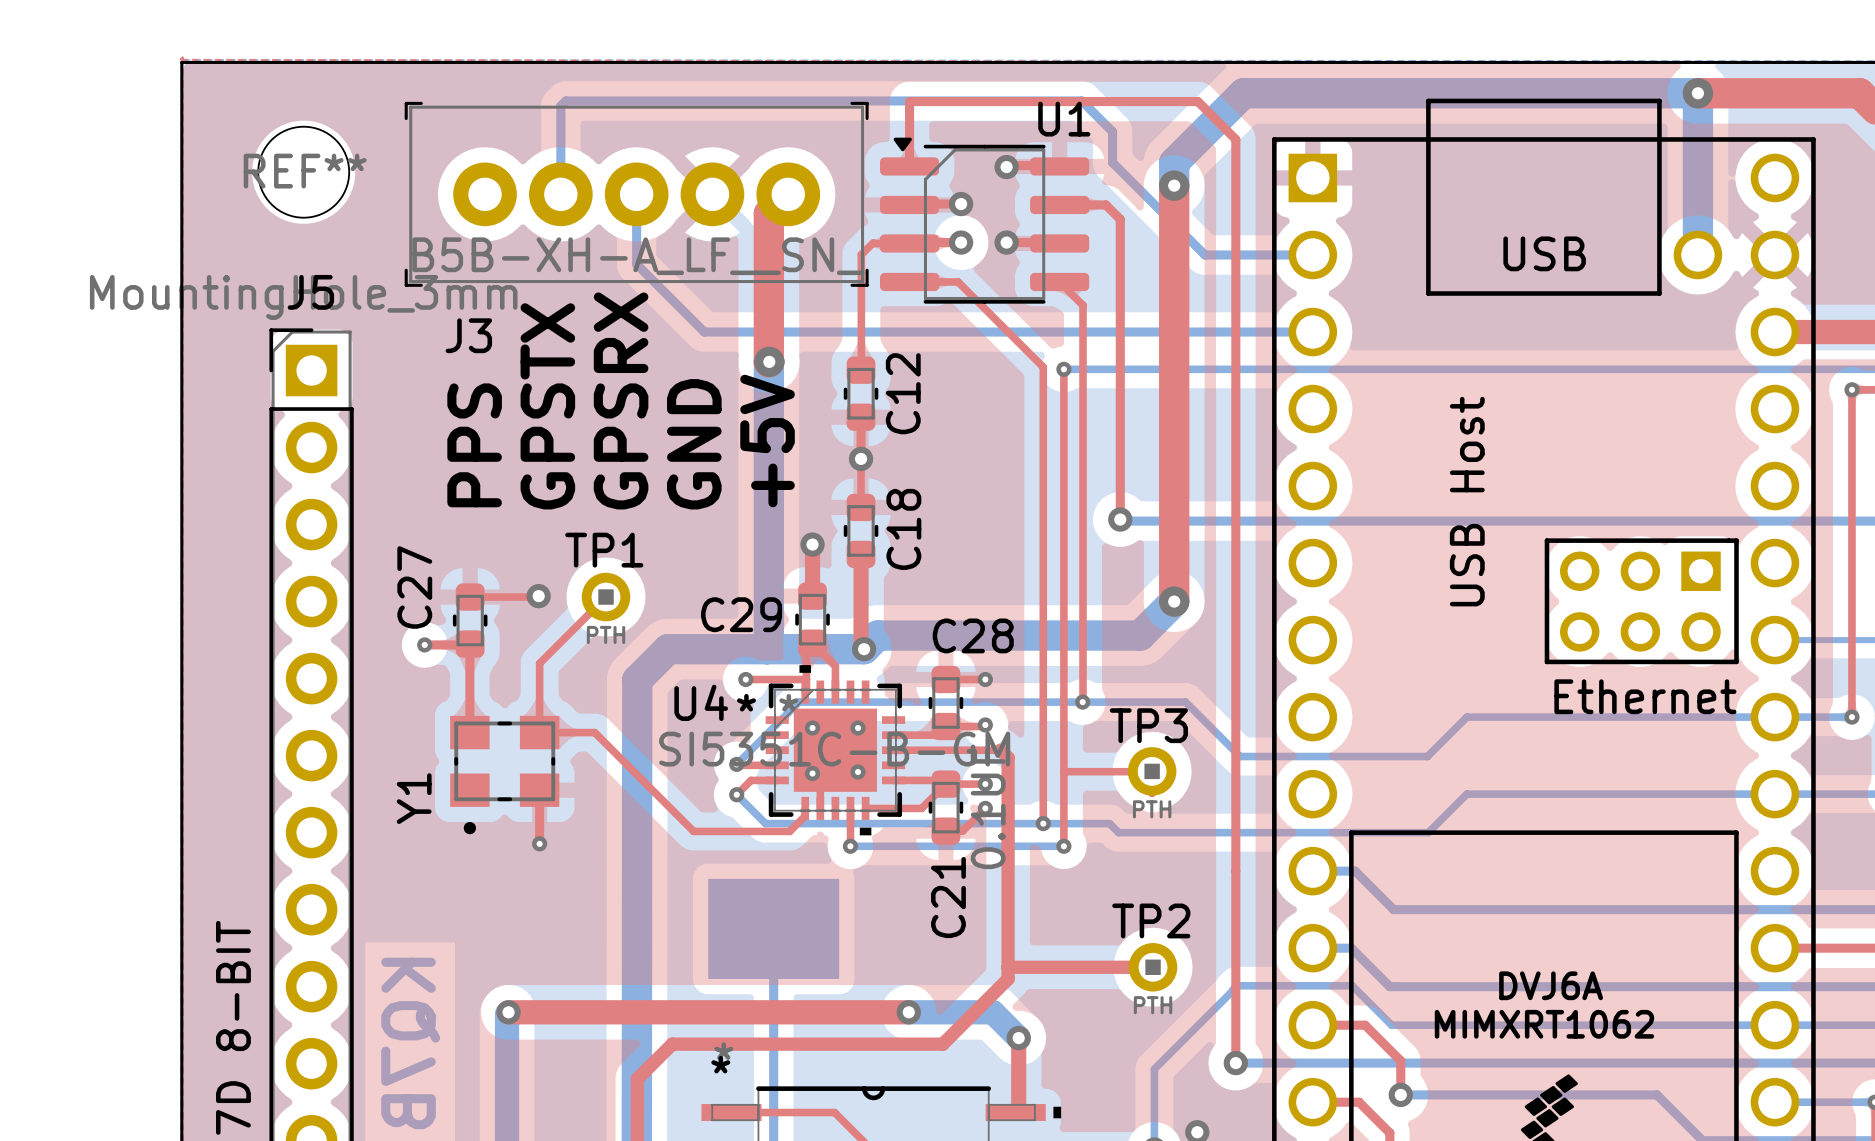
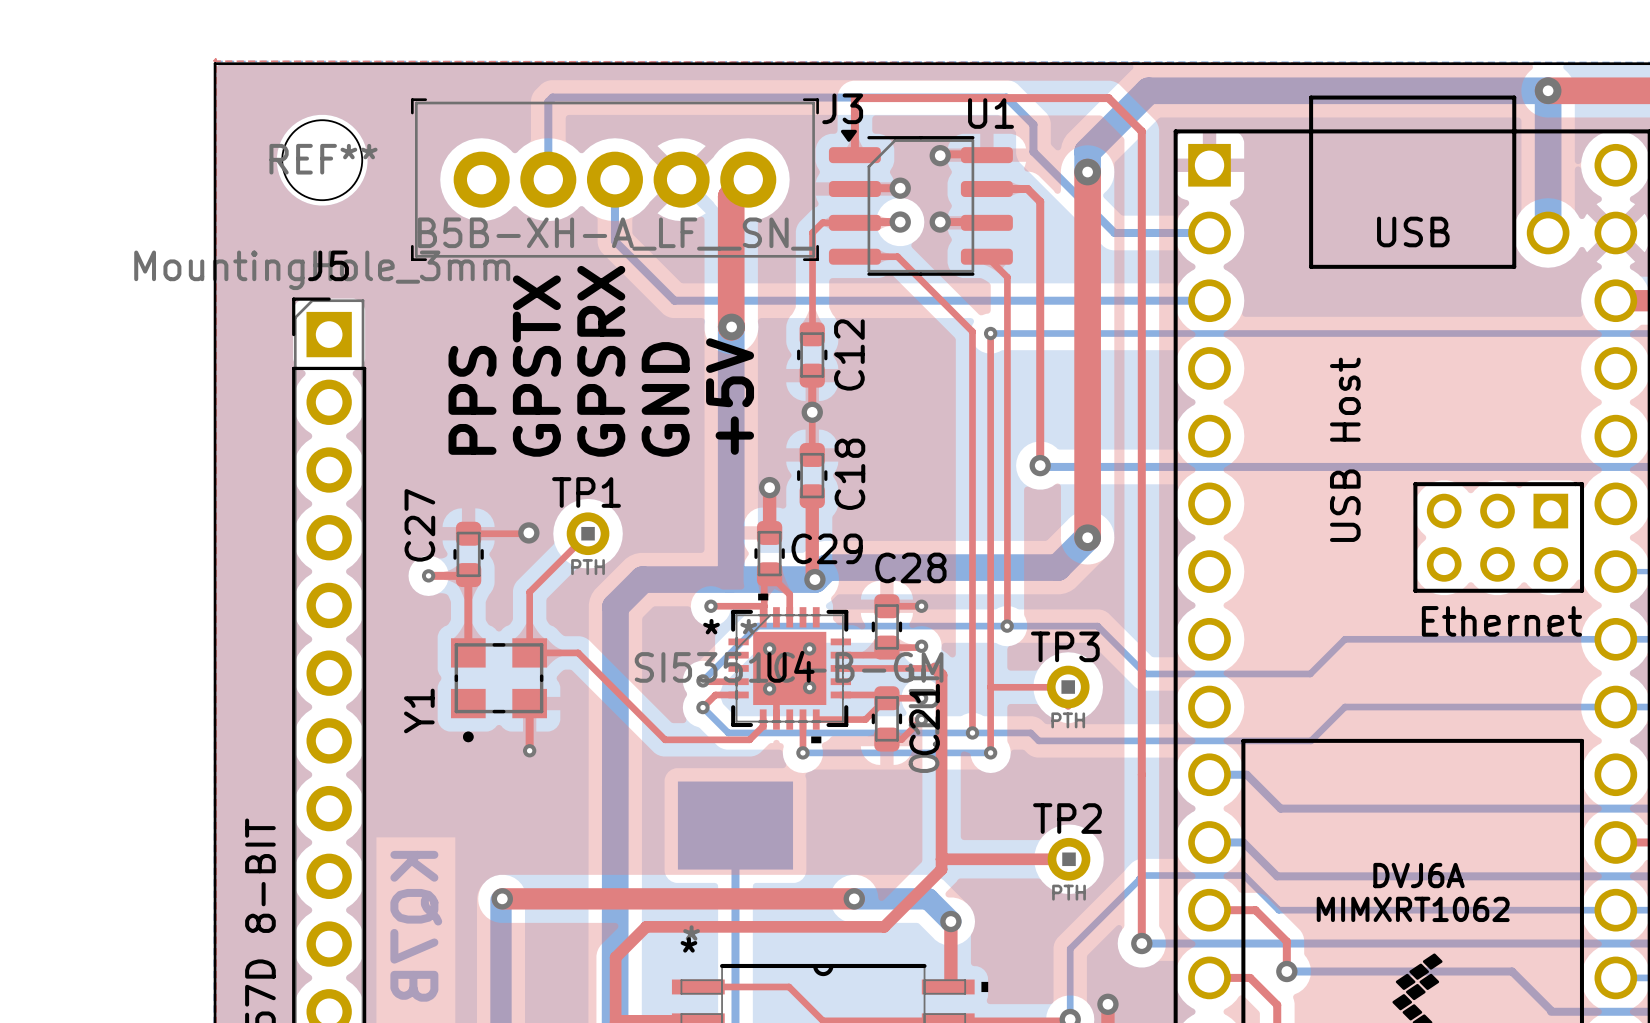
J3 name position: J3 (468, 335) -> J3 (842, 108)
C29 name position: C29 (741, 614) -> C29 (827, 548)
U4 name position: U4 (701, 702) -> U4 (791, 666)
C21 name position: C21 (948, 897) -> C21 (924, 719)

